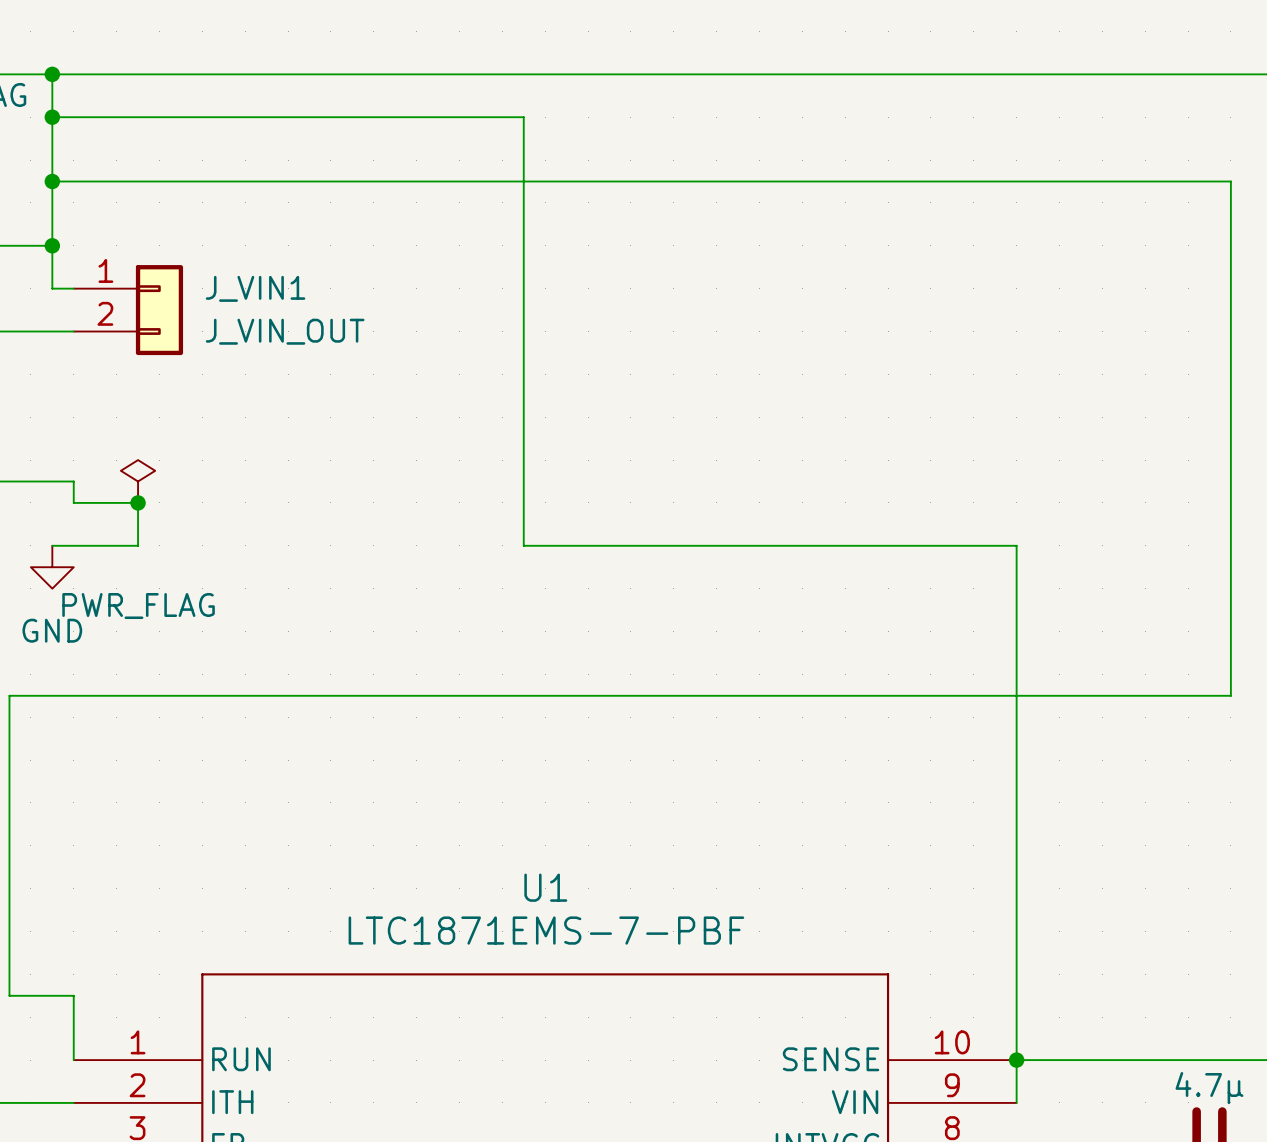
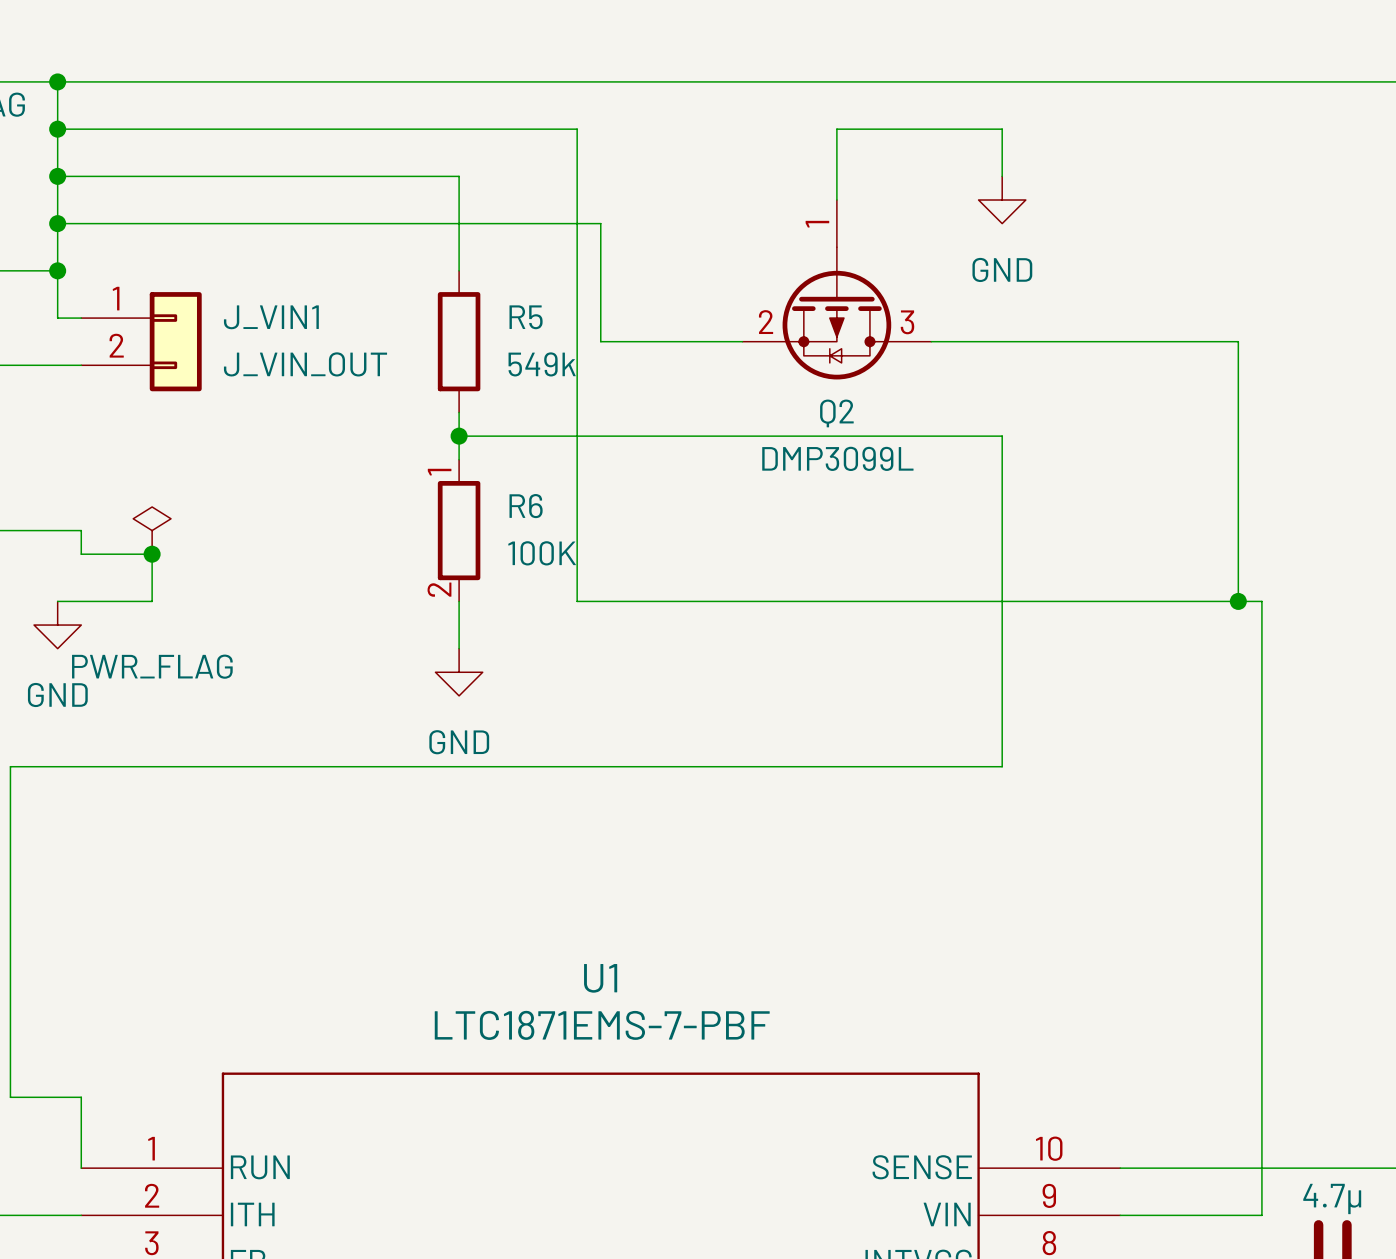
wire: none -> (57, 176) (459, 176) (459, 270)
junction: none -> (57, 176)
wire: none -> (1002, 176) (1002, 129) (836, 129) (836, 200)
wire: (52, 181) (1230, 181) (1230, 695) (909, 695) -> (459, 436) (1002, 436) (1002, 766)
junction: (52, 181) -> none
power symbol: none -> GND (1002, 200)
wire: none -> (57, 223) (600, 223) (600, 341) (742, 341)
junction: none -> (57, 223)
Q2: none -> DMP3099L (836, 289)
R5: none -> 549k (459, 341)
wire: none -> (931, 341) (1238, 341) (1238, 601)
wire: none -> (459, 412) (459, 459)
junction: none -> (459, 436)
R6: none -> 100K (459, 530)
wire: none -> (459, 601) (459, 648)
wire: (1016, 545) (1016, 1102) -> (1120, 601) (1261, 601) (1261, 1215) (1120, 1215)
junction: none -> (1238, 601)
power symbol: none -> GND (459, 672)
junction: (1016, 1060) -> none

